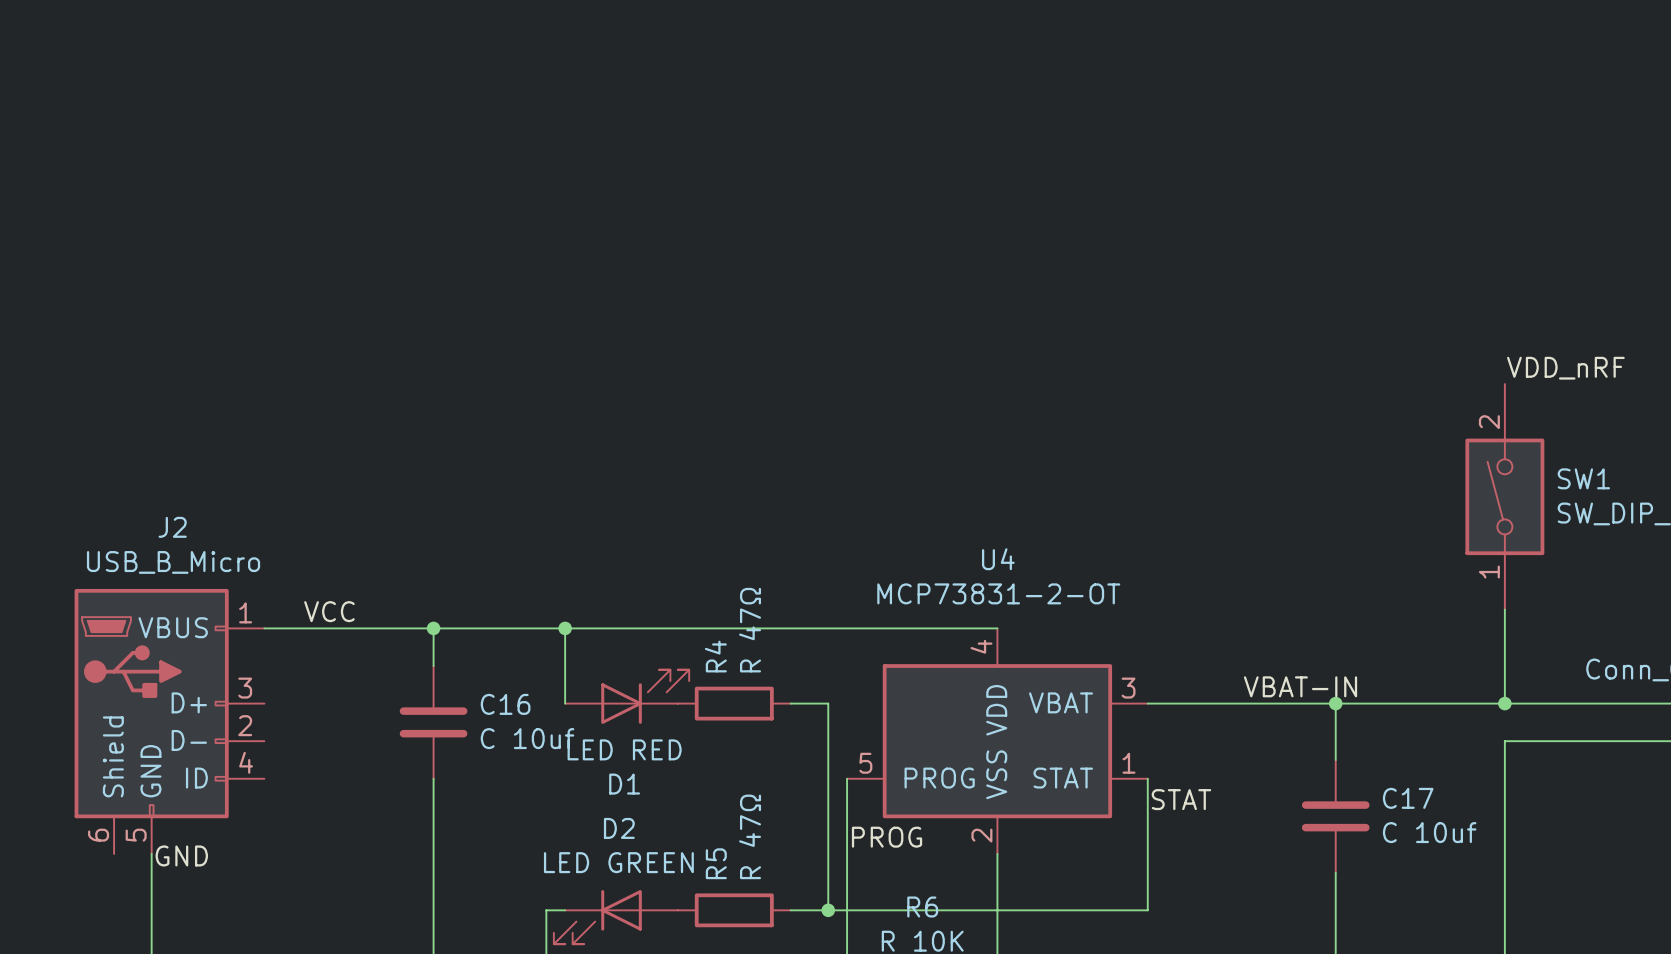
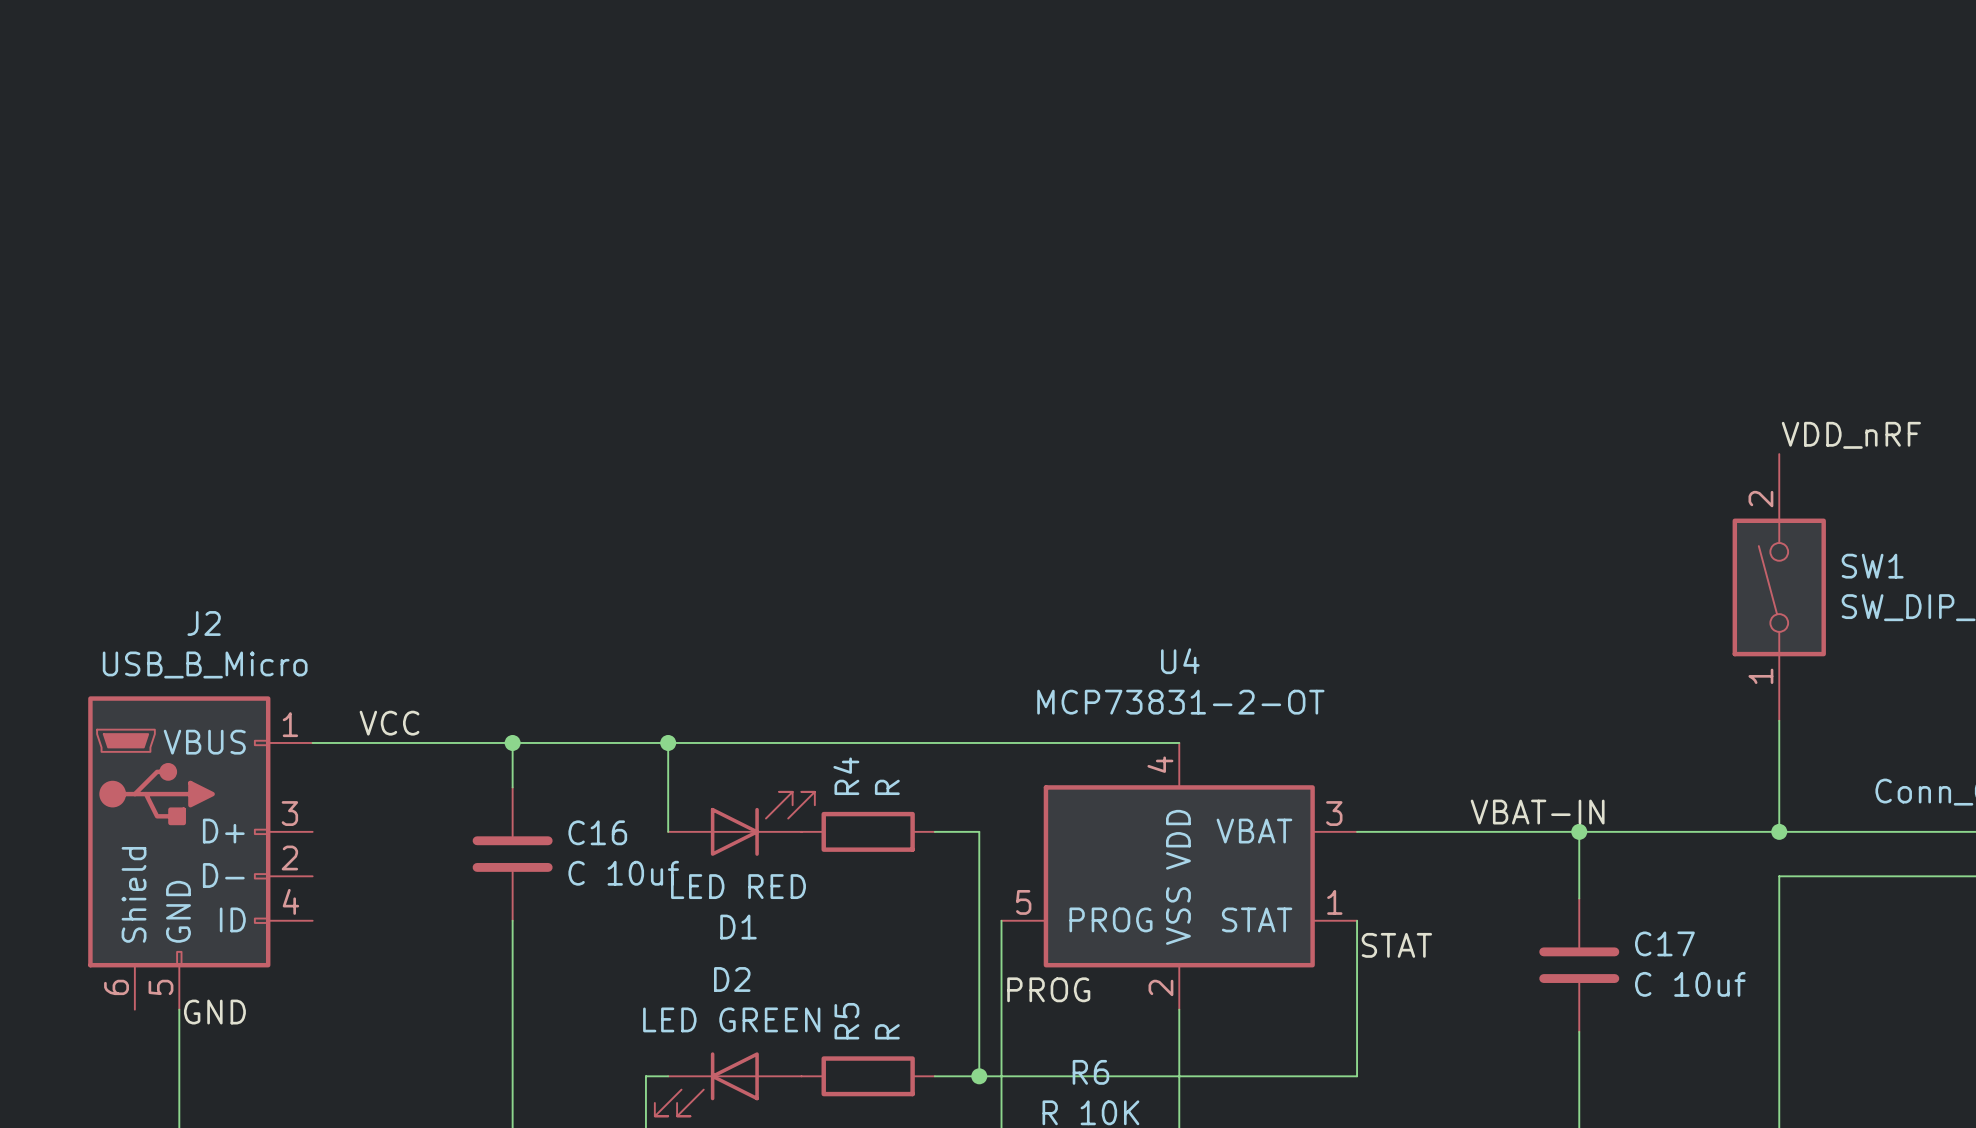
R4 value: R 47Ω (750, 630) -> R (887, 787)
R5 value: R 47Ω (750, 836) -> R (887, 1031)

